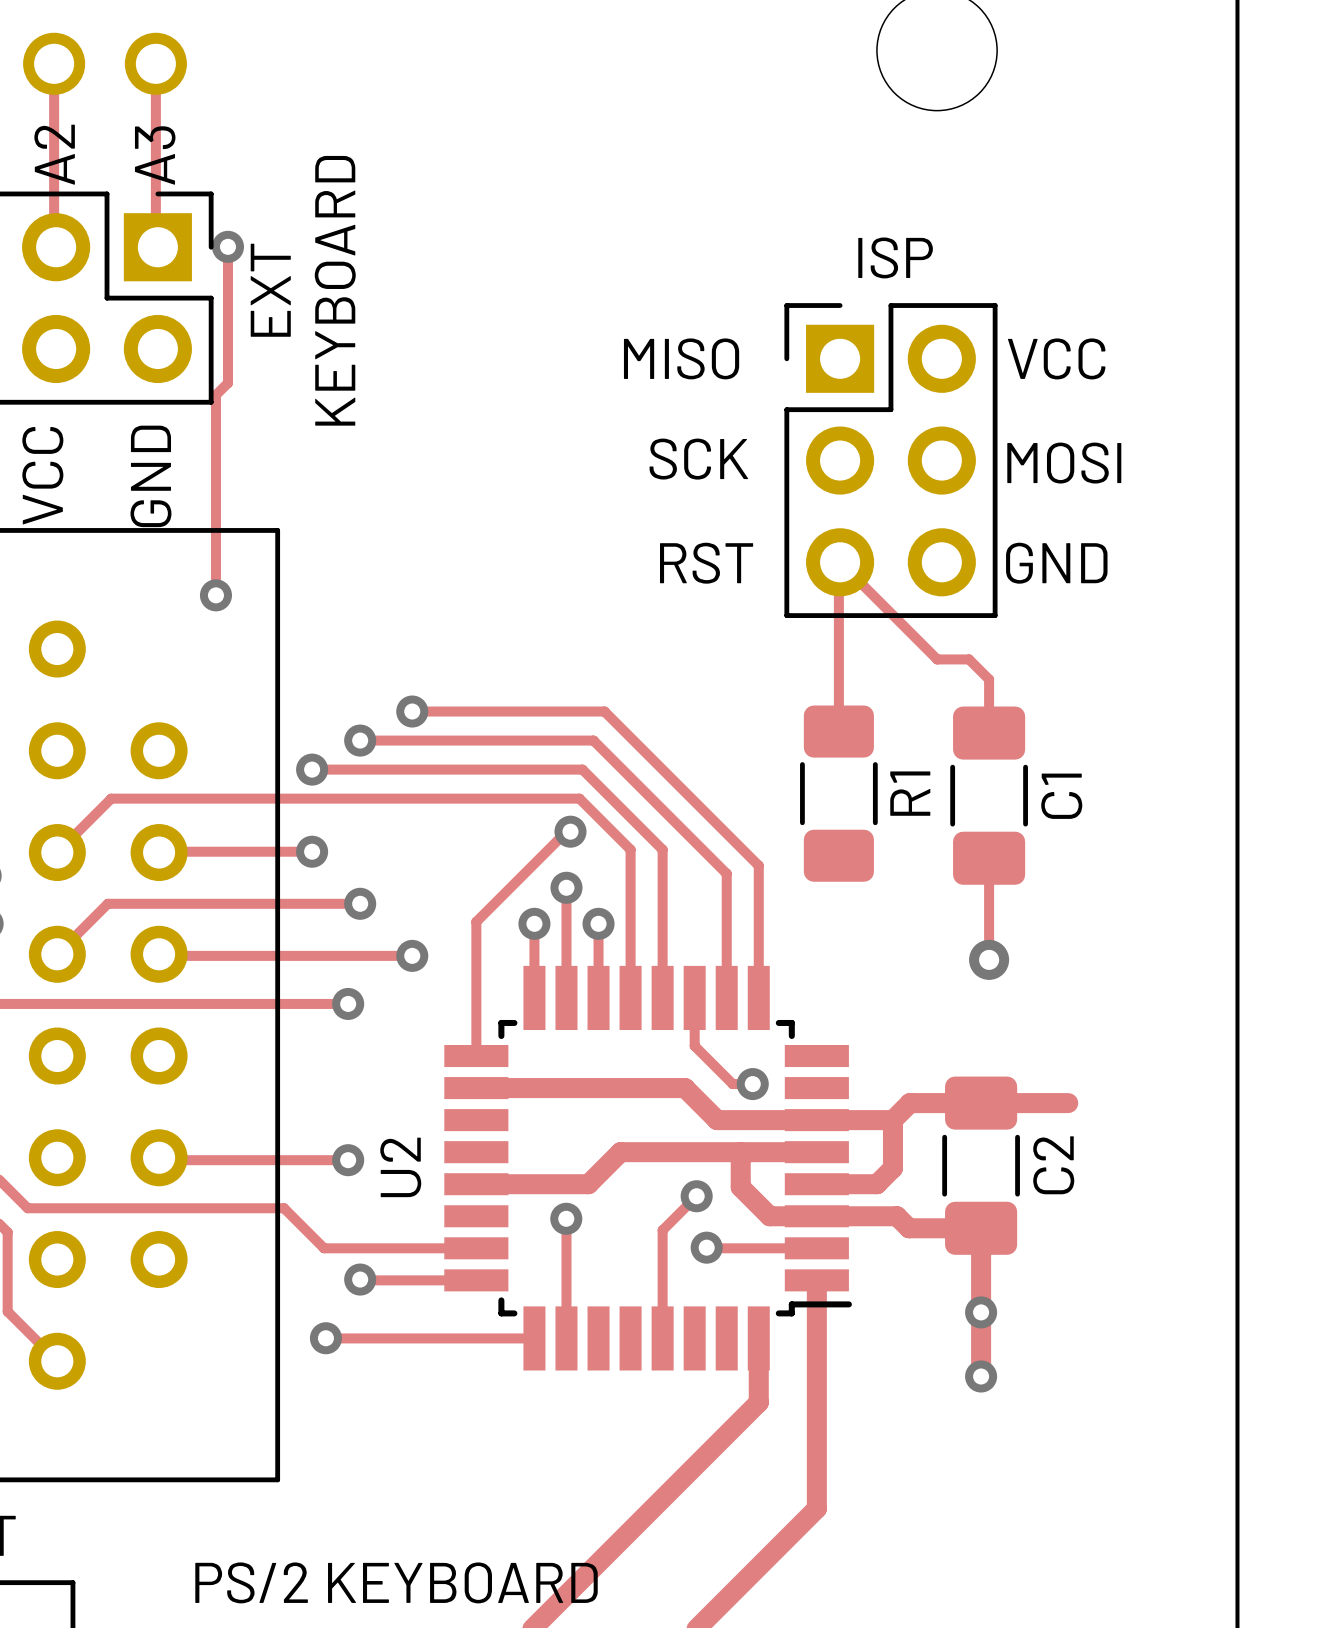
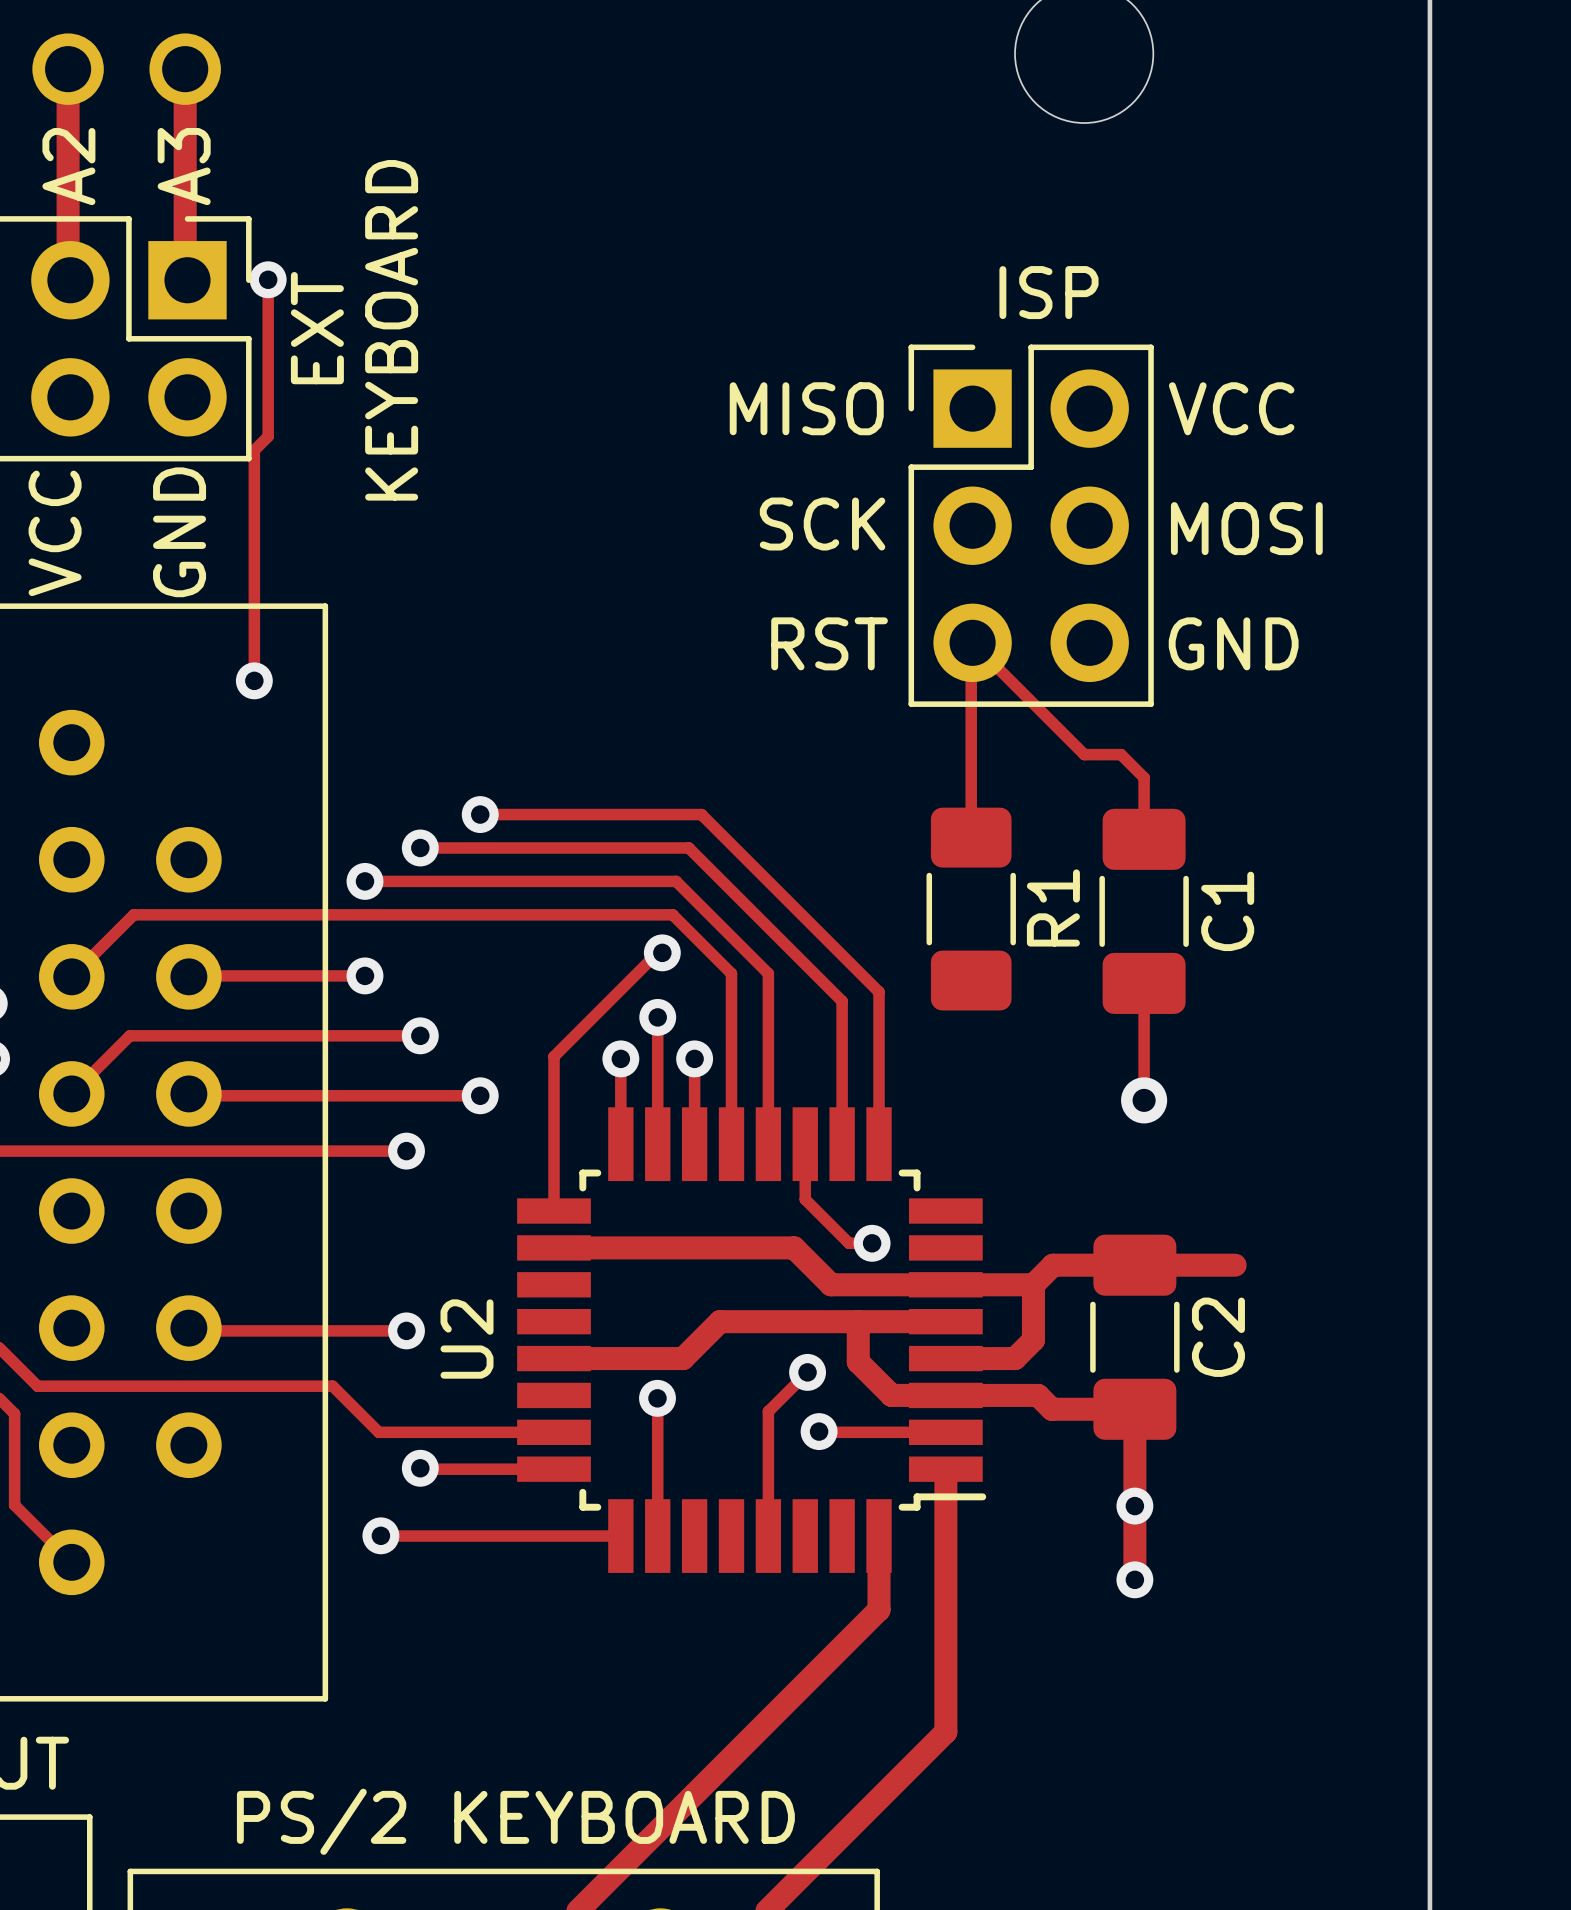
track width: thin (54, 63) (54, 245) -> thick (68, 69) (68, 277)
track width: thin (155, 63) (155, 245) -> thick (185, 69) (185, 277)

